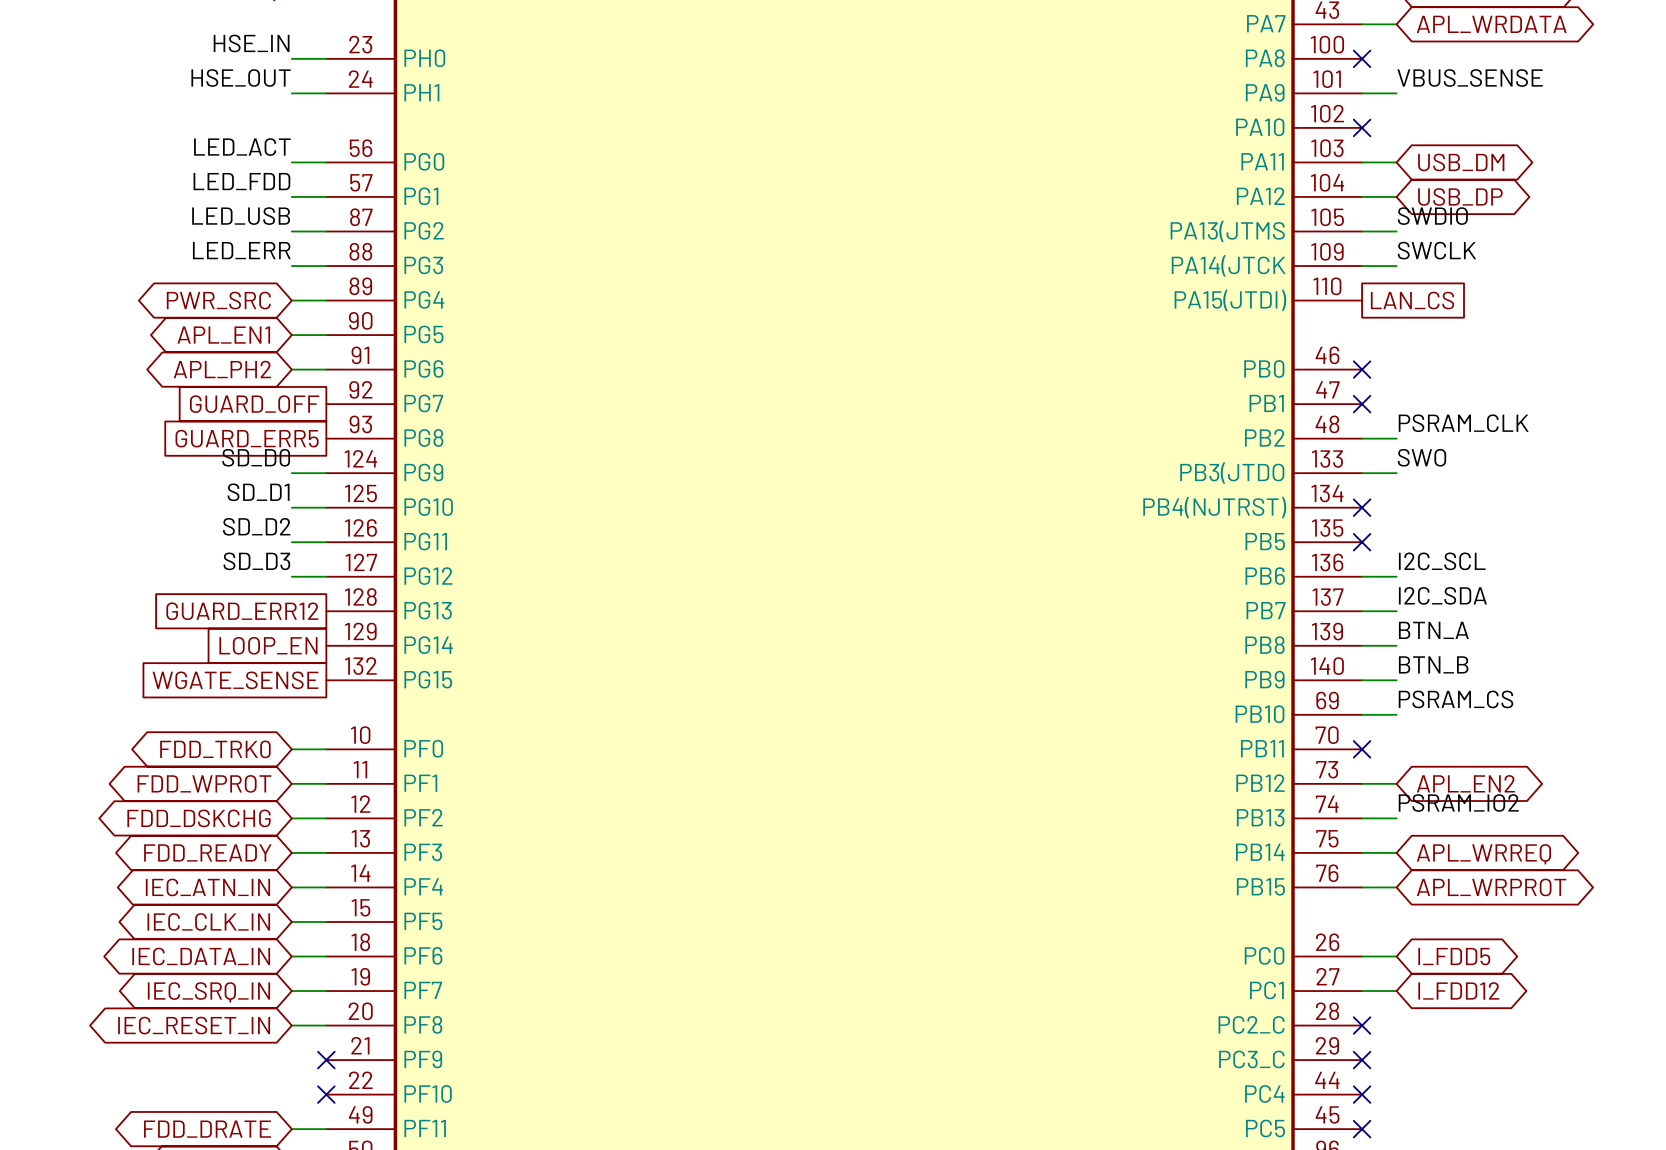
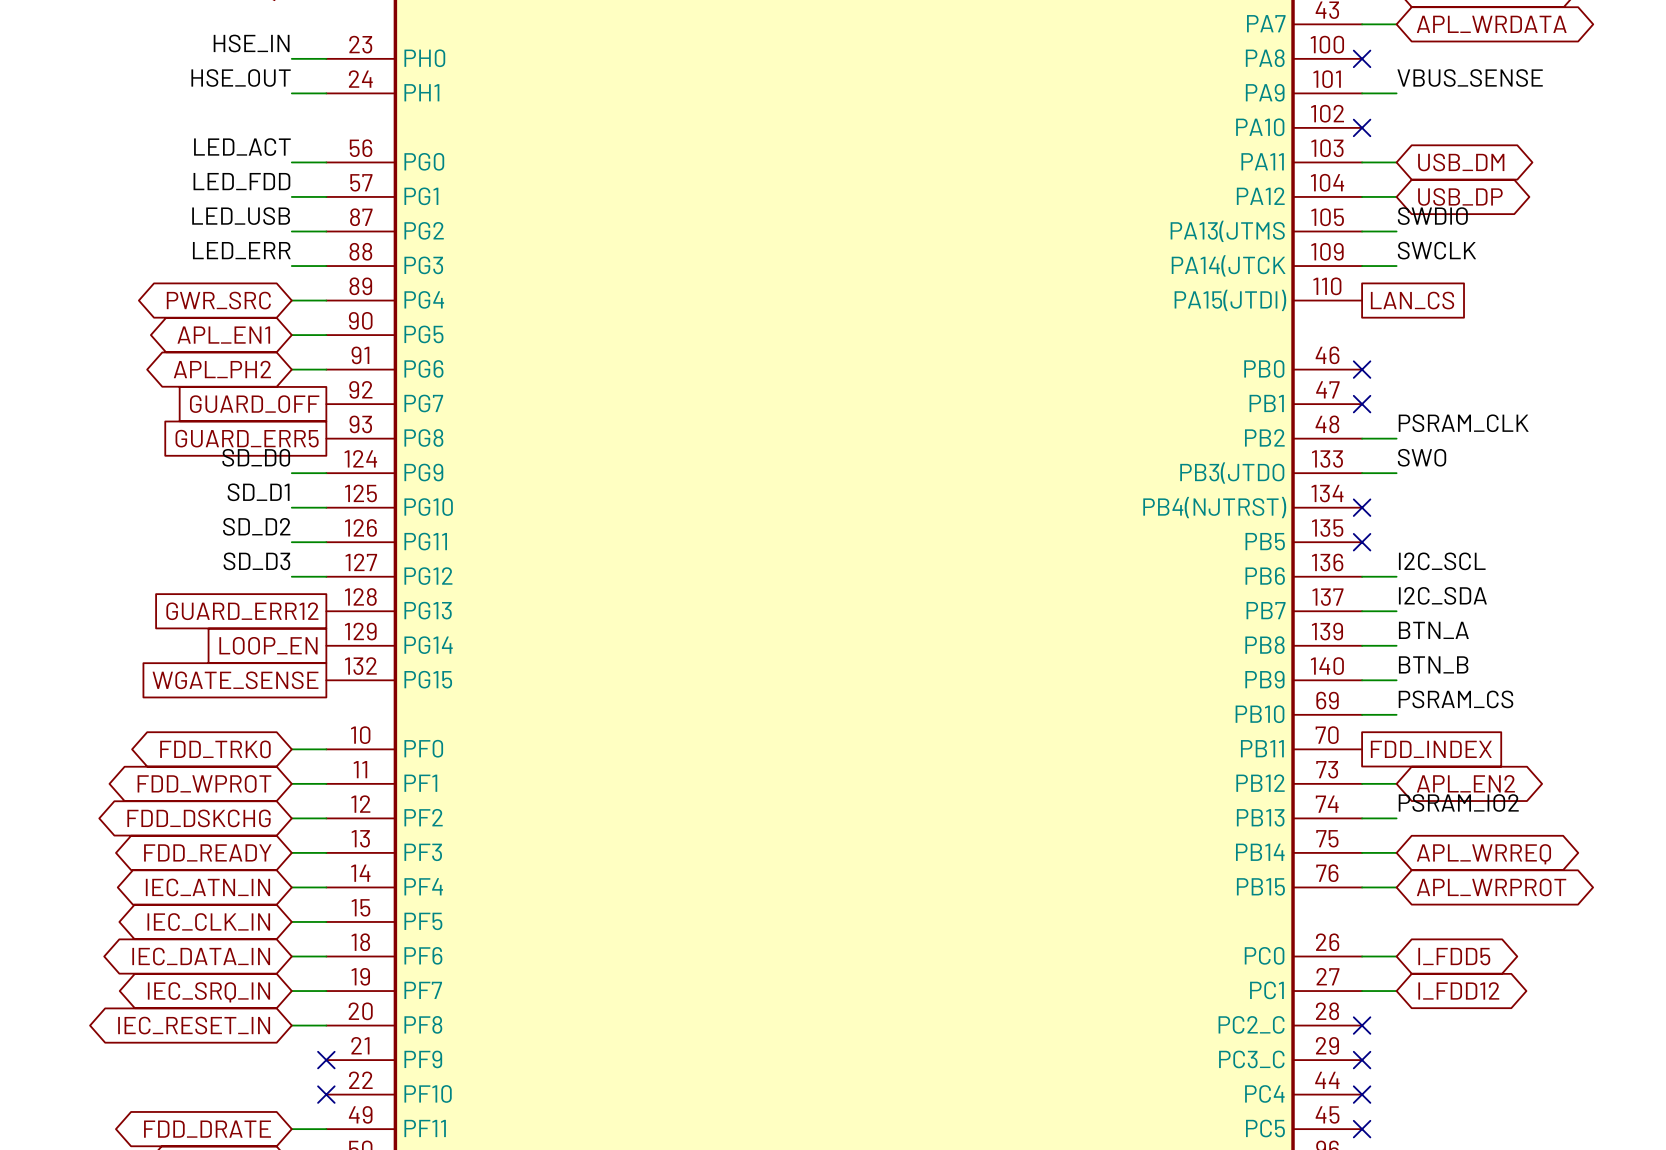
no-connect mark: (1362, 749) -> none
global label: none -> FDD_INDEX (1431, 749)

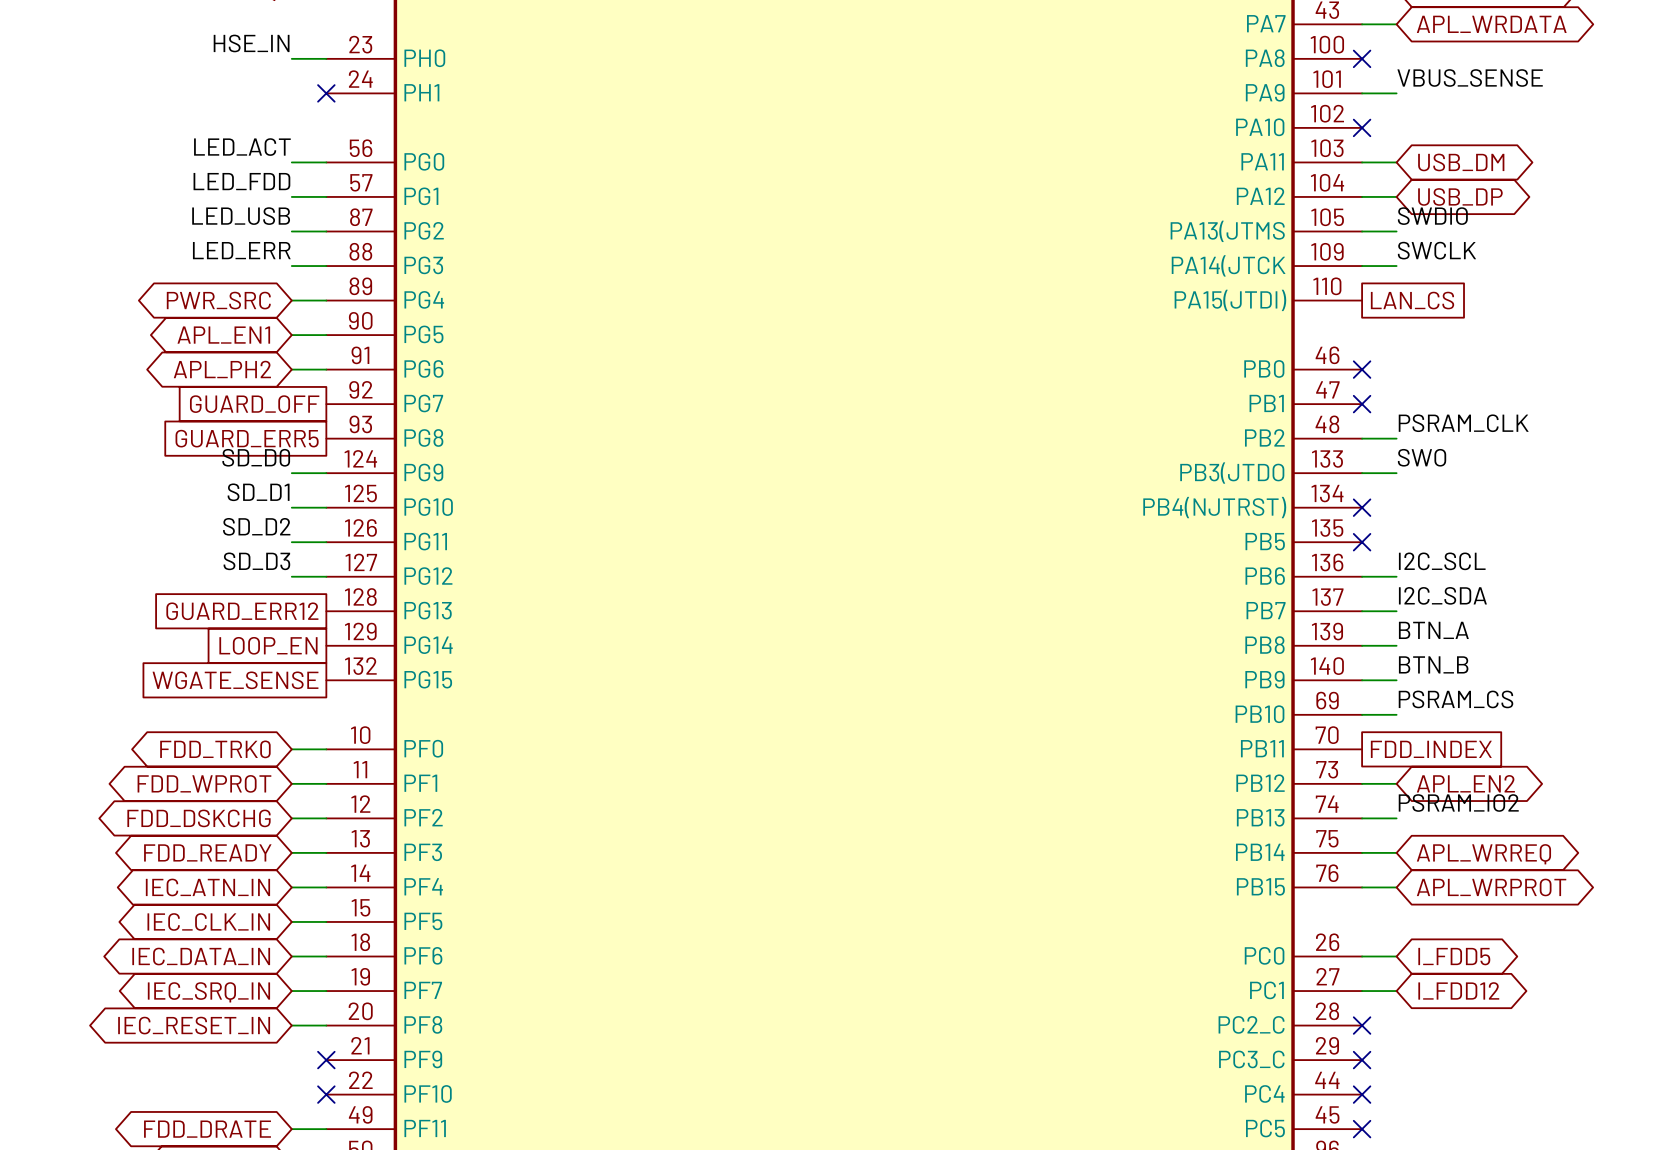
label: HSE_OUT (241, 77) -> none
wire: (291, 93) (326, 93) -> none
no-connect mark: none -> (326, 93)

